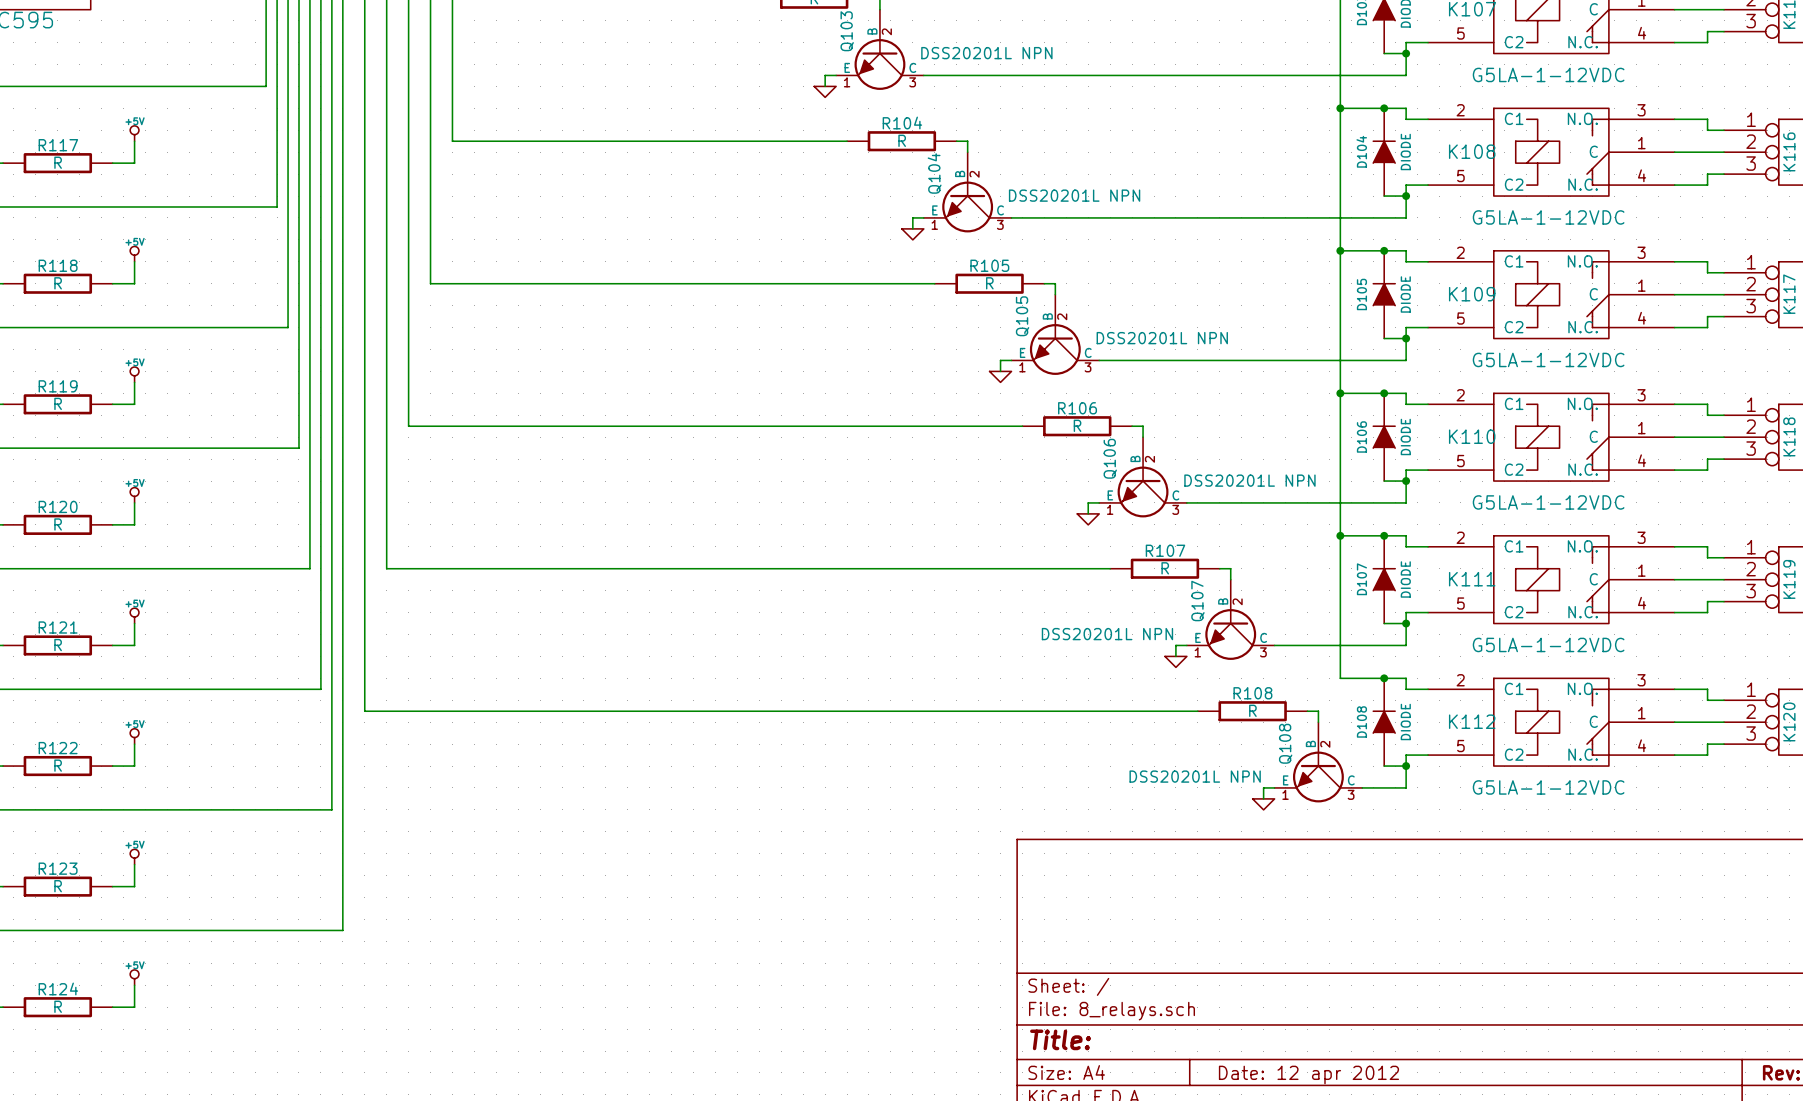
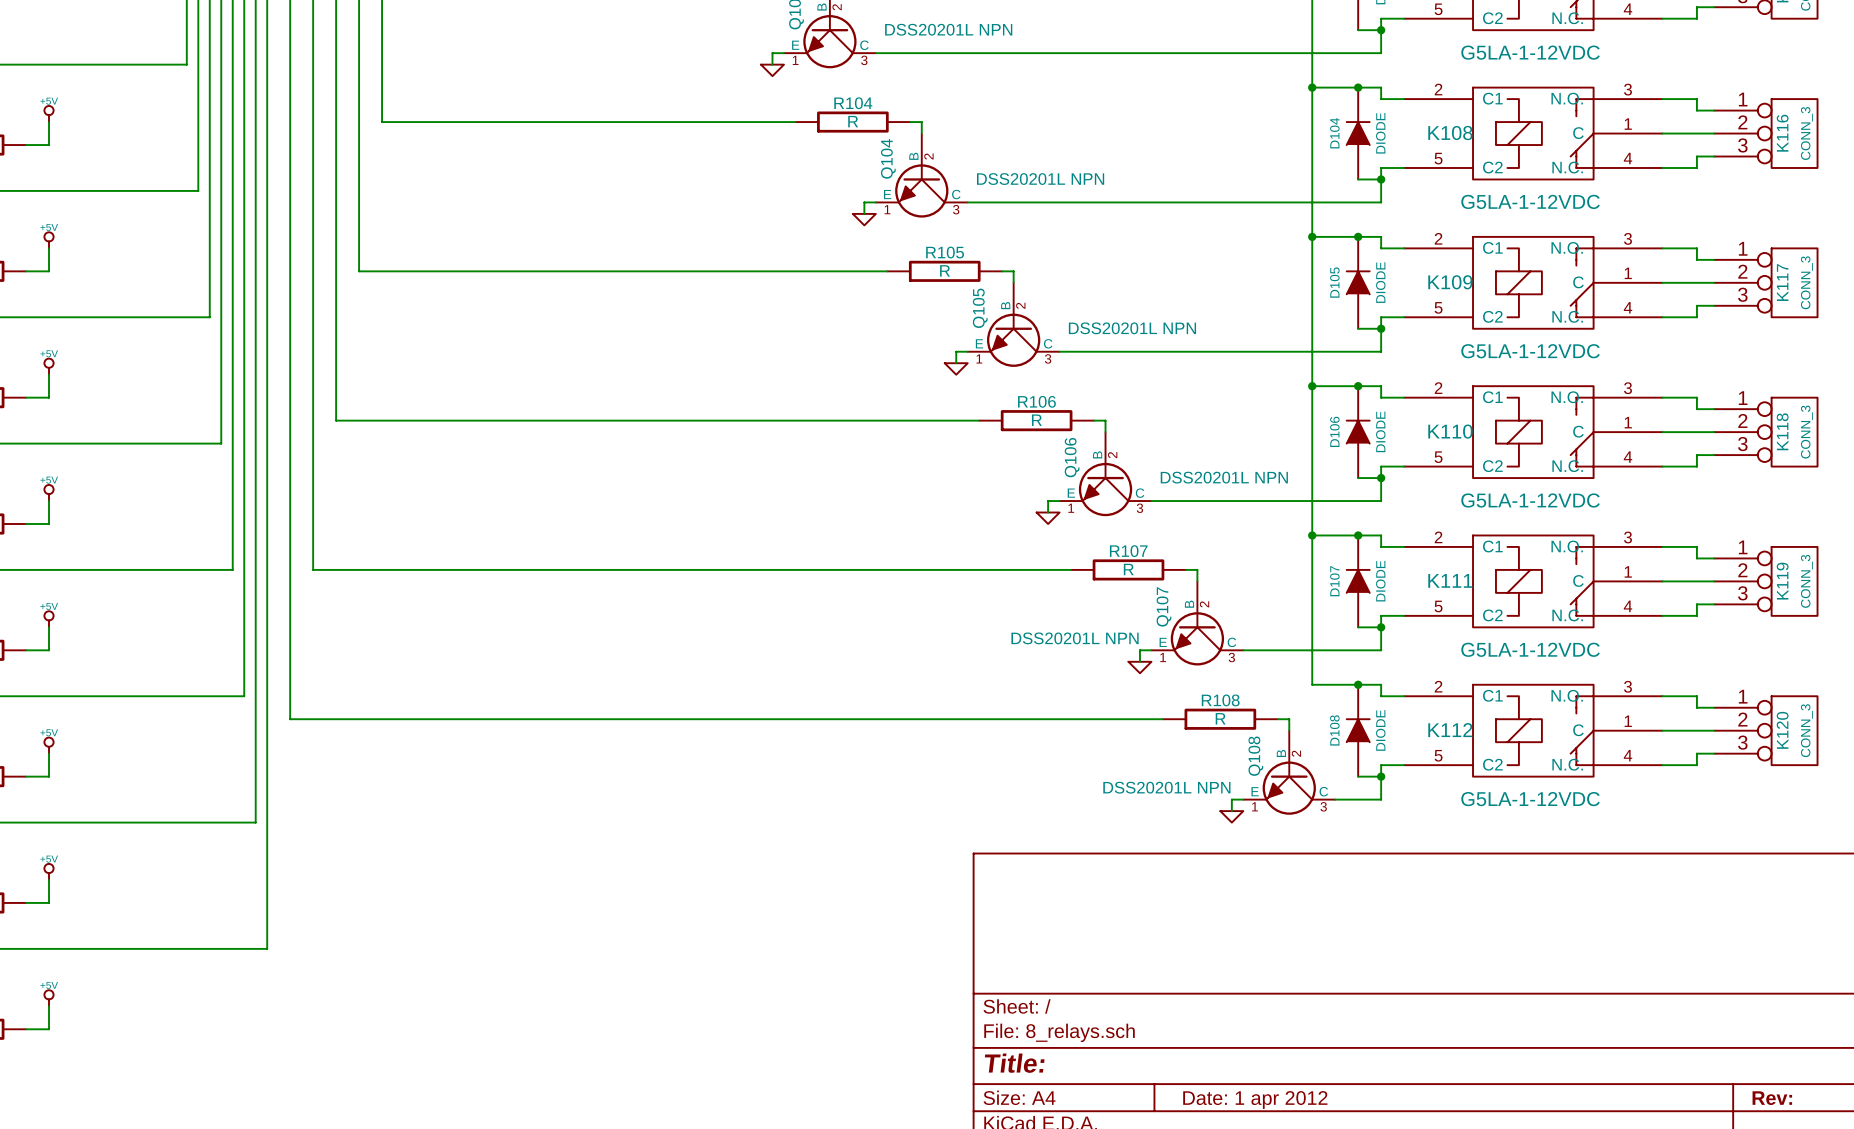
title block: Date: 12 apr 2012 (1308, 1074) -> Date: 1 apr 2012 (1255, 1100)

